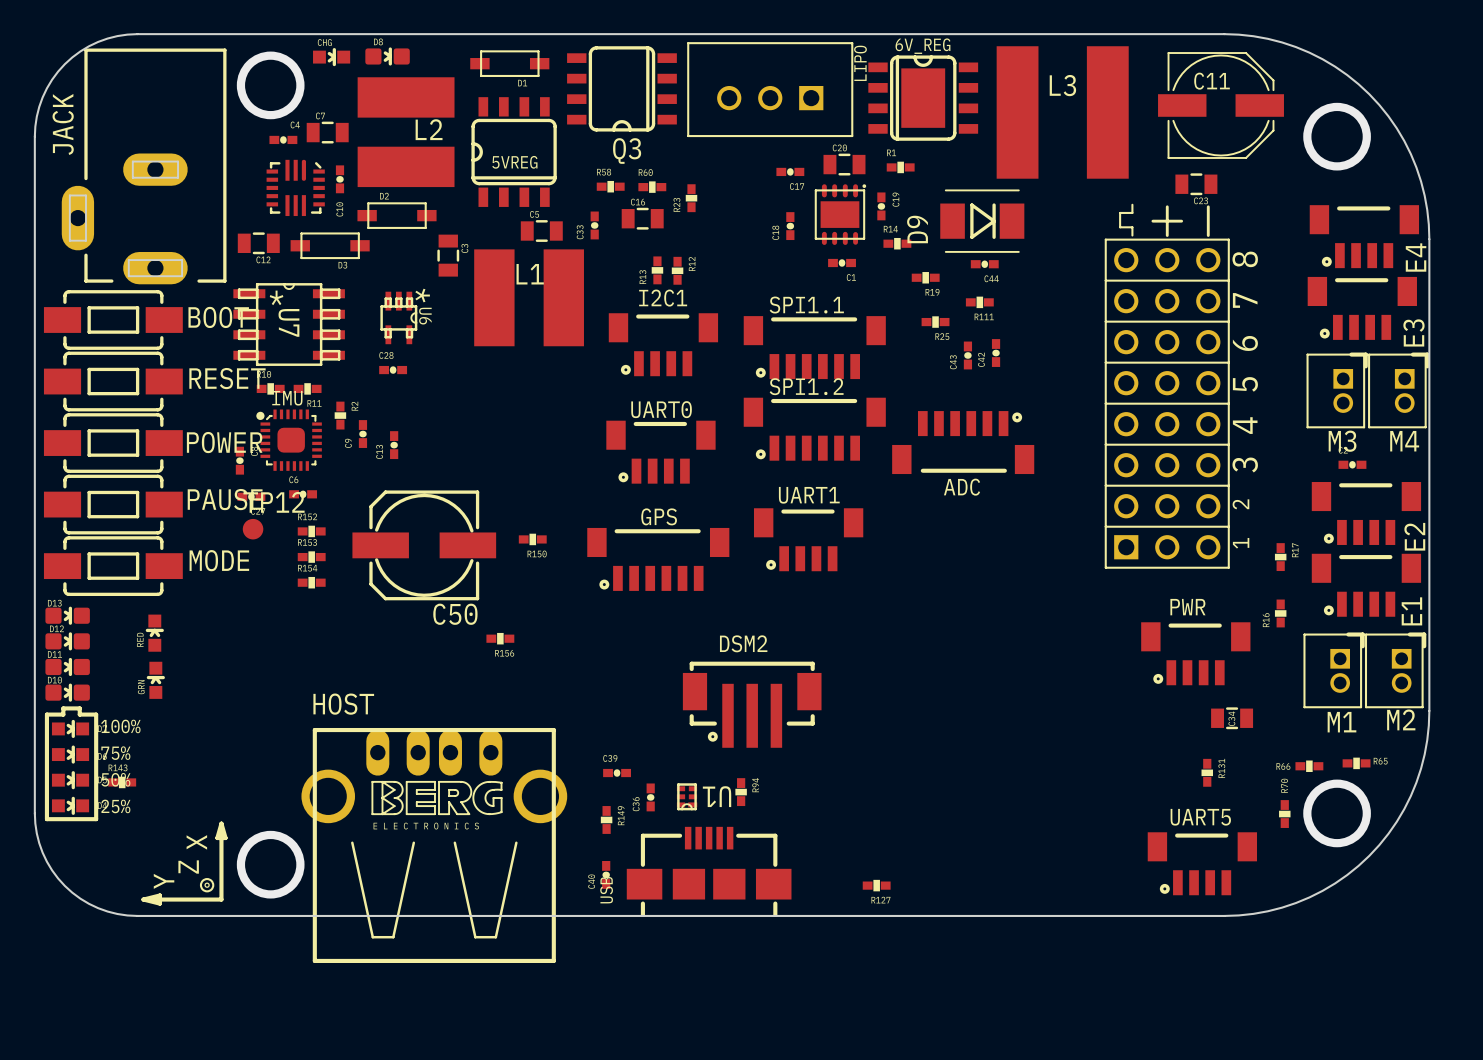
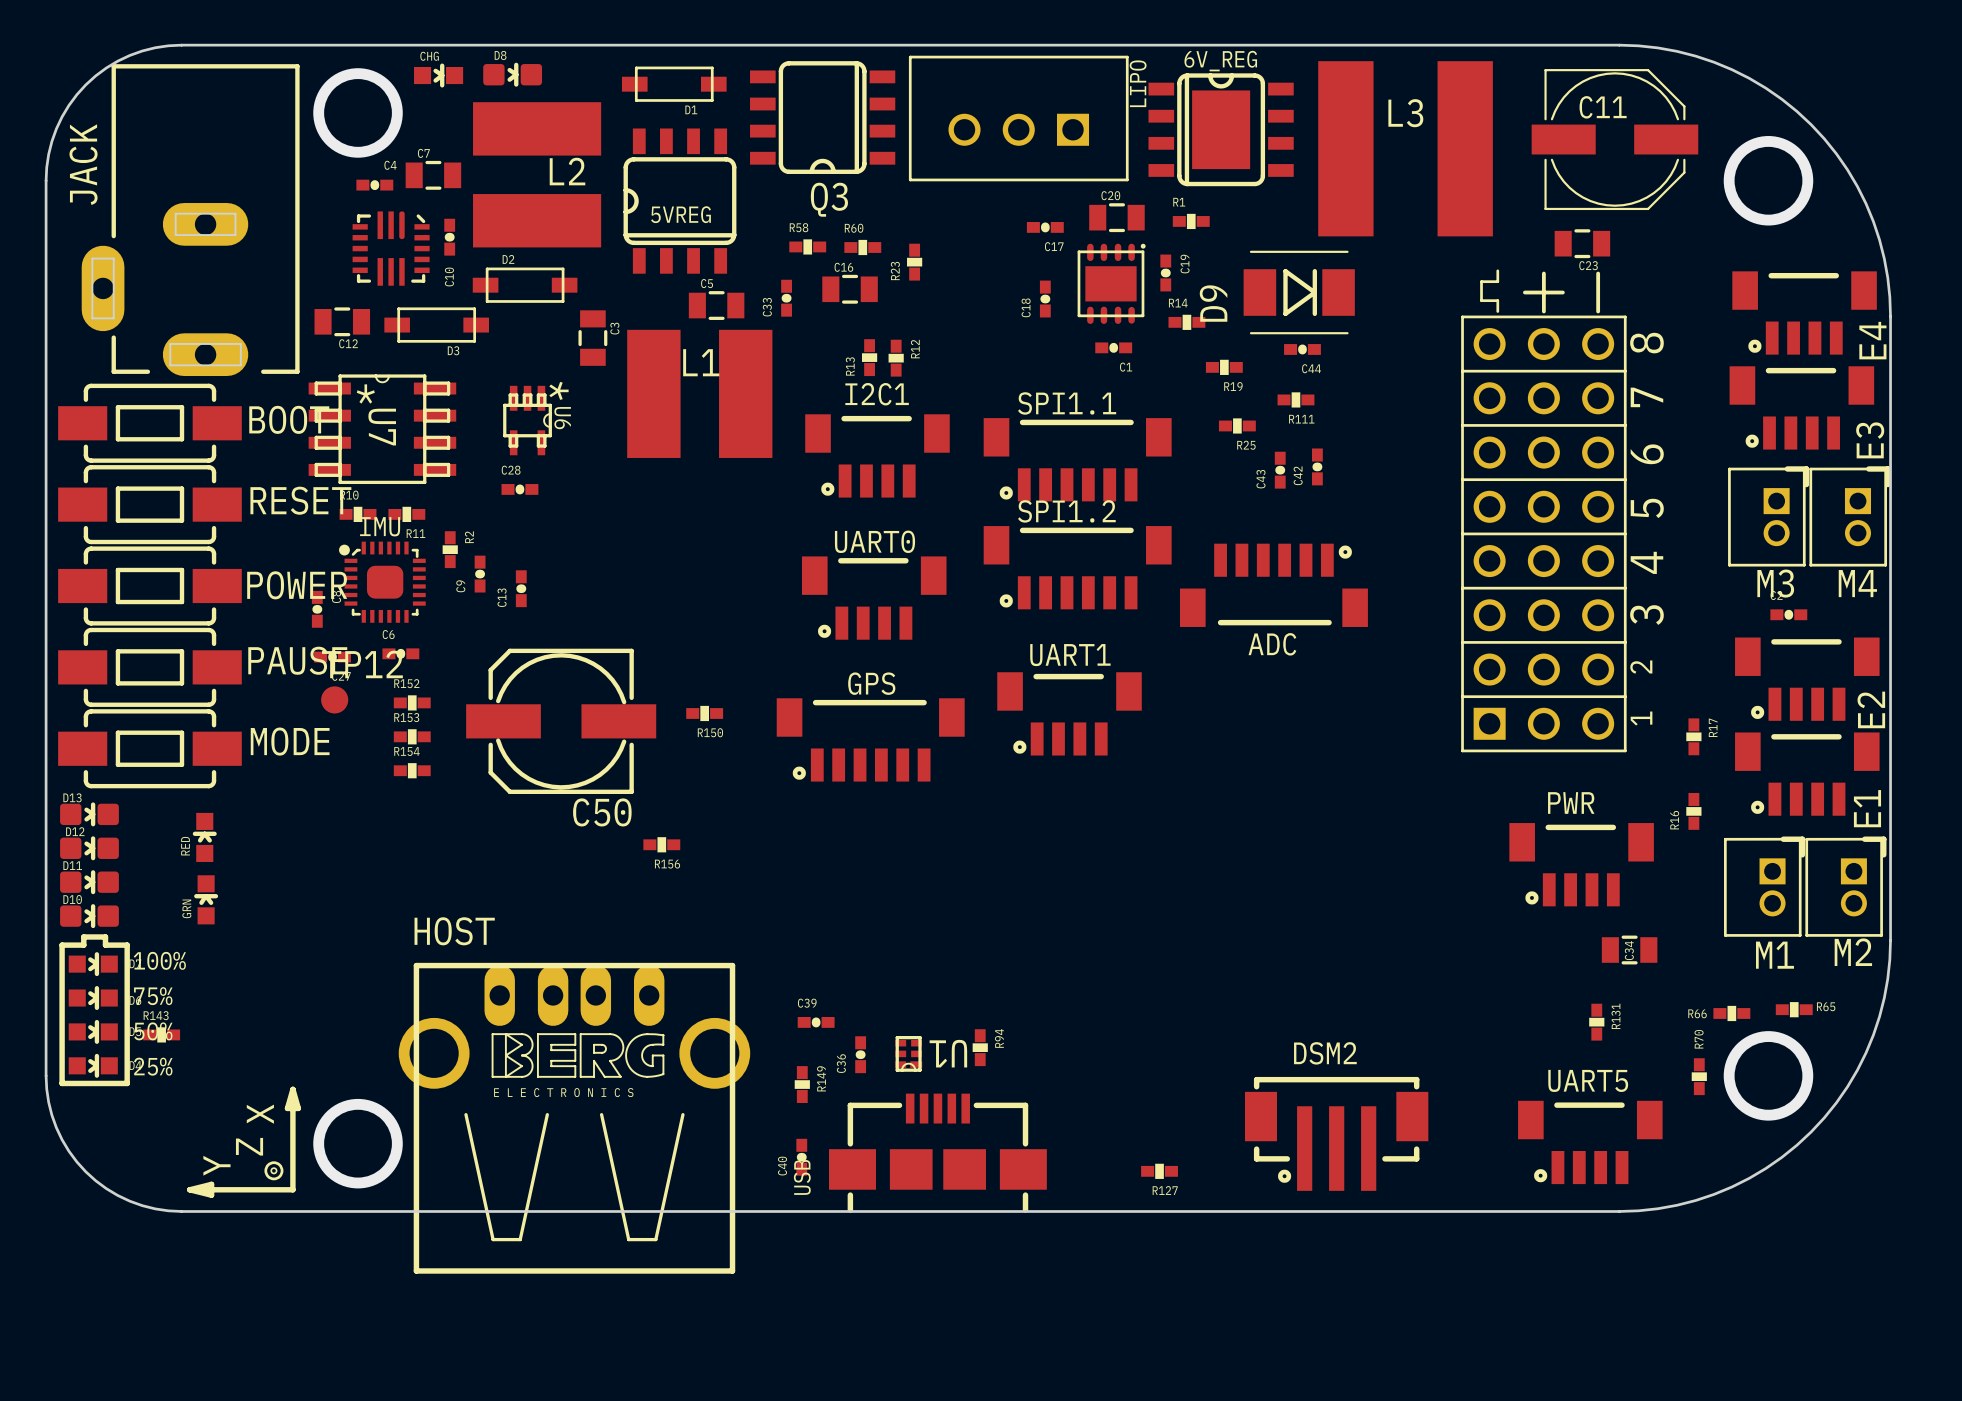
DSM2 position: (752, 704) -> (1336, 1133)

